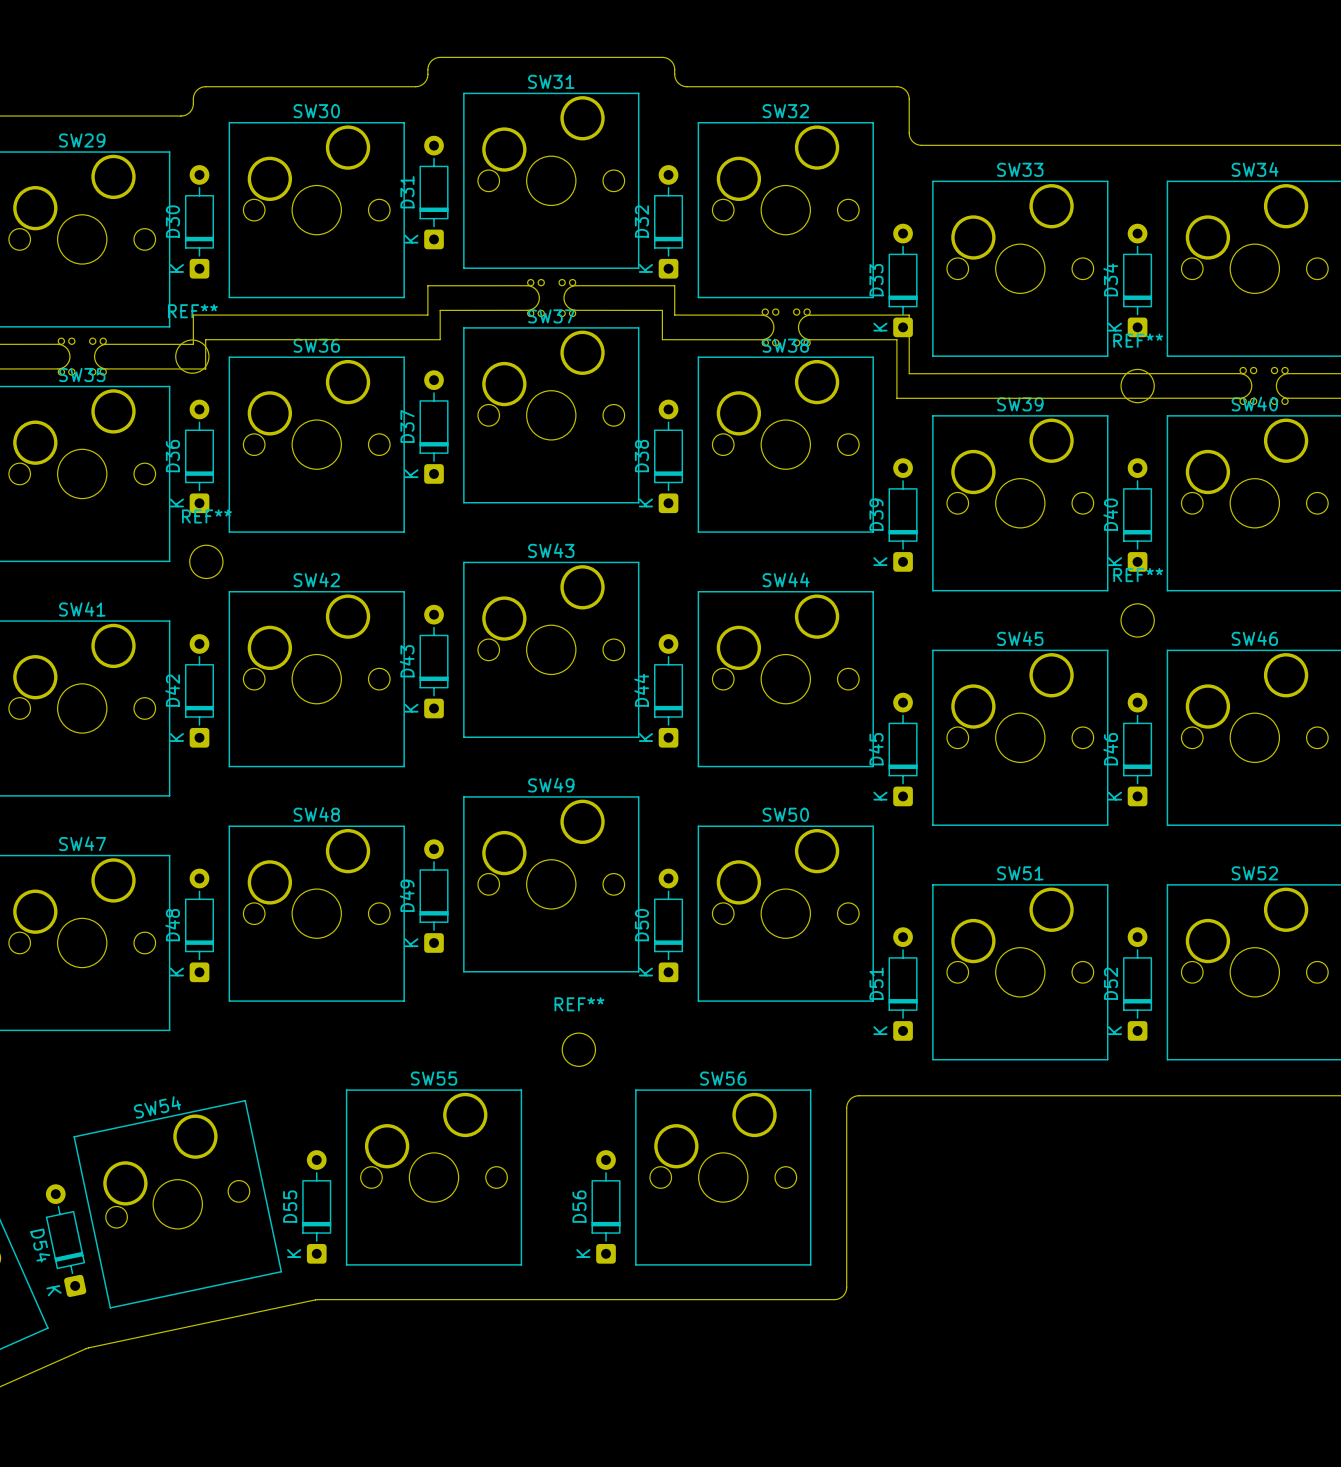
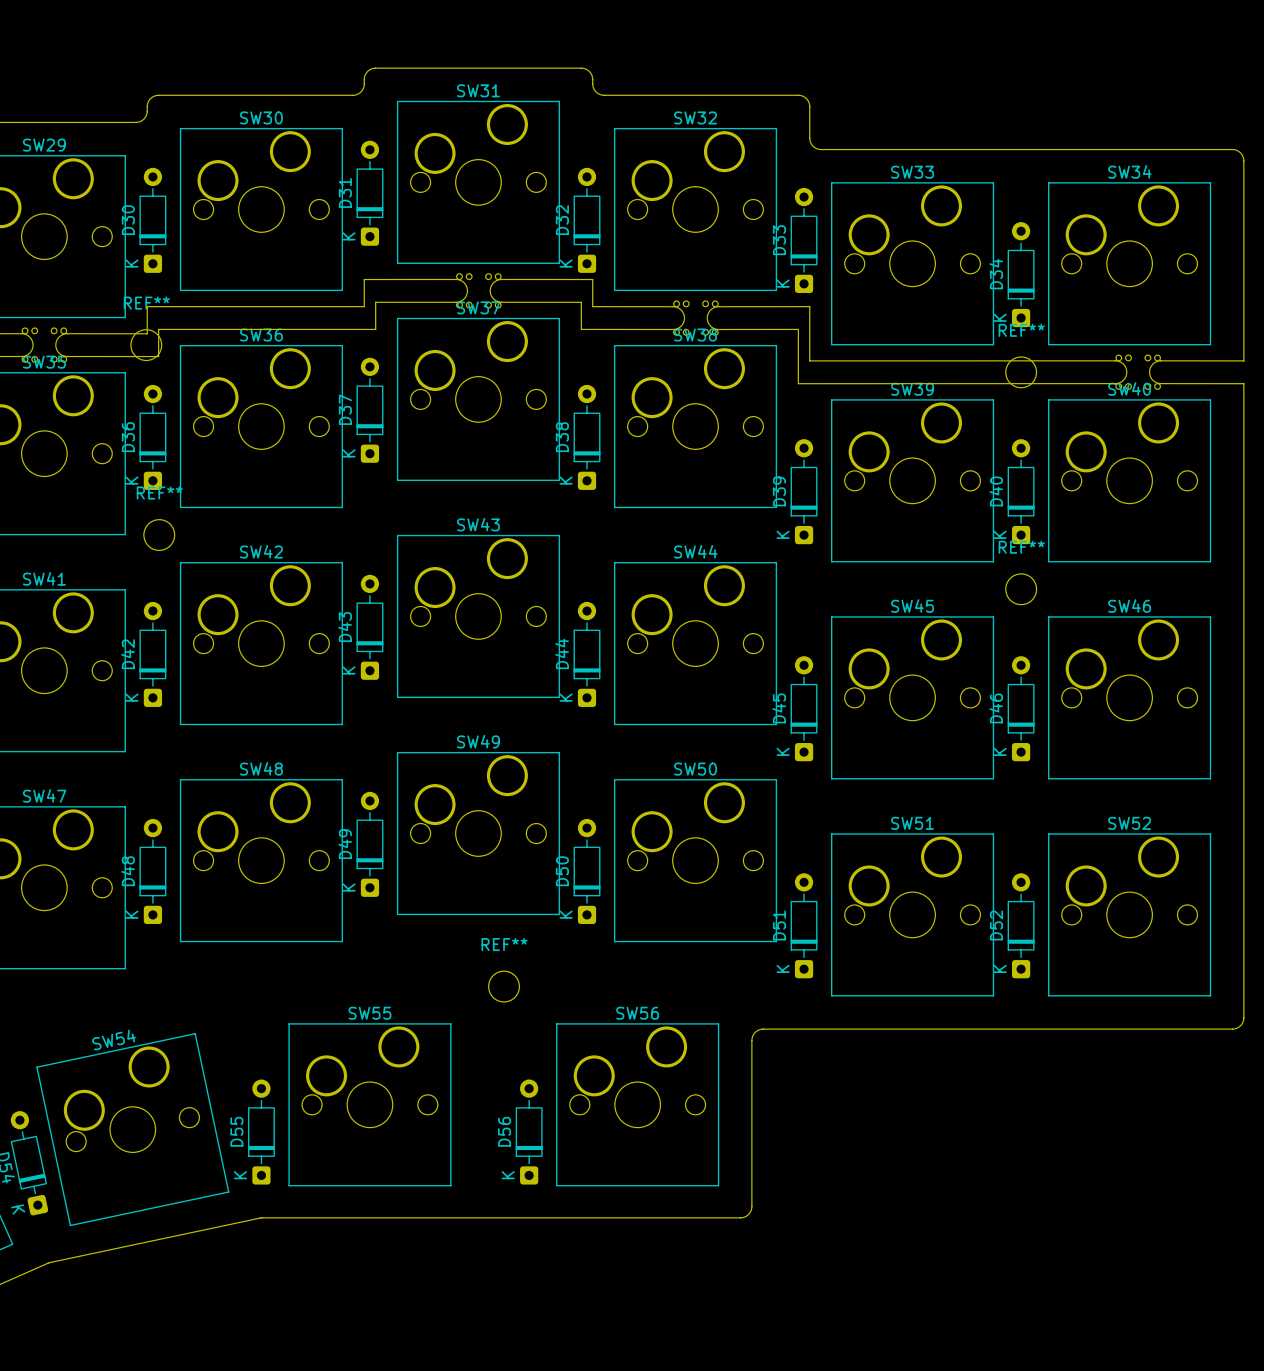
D33 position: (903, 280) -> (804, 240)

